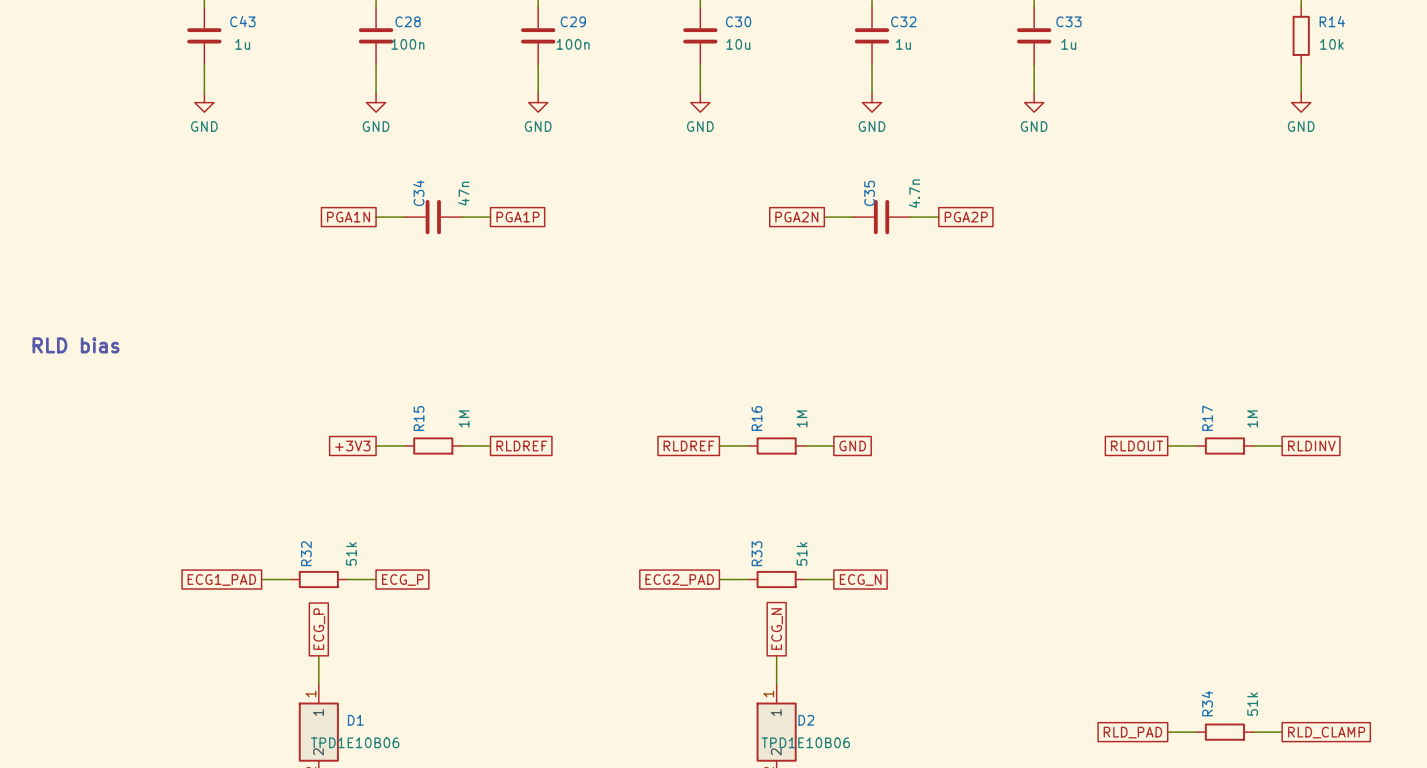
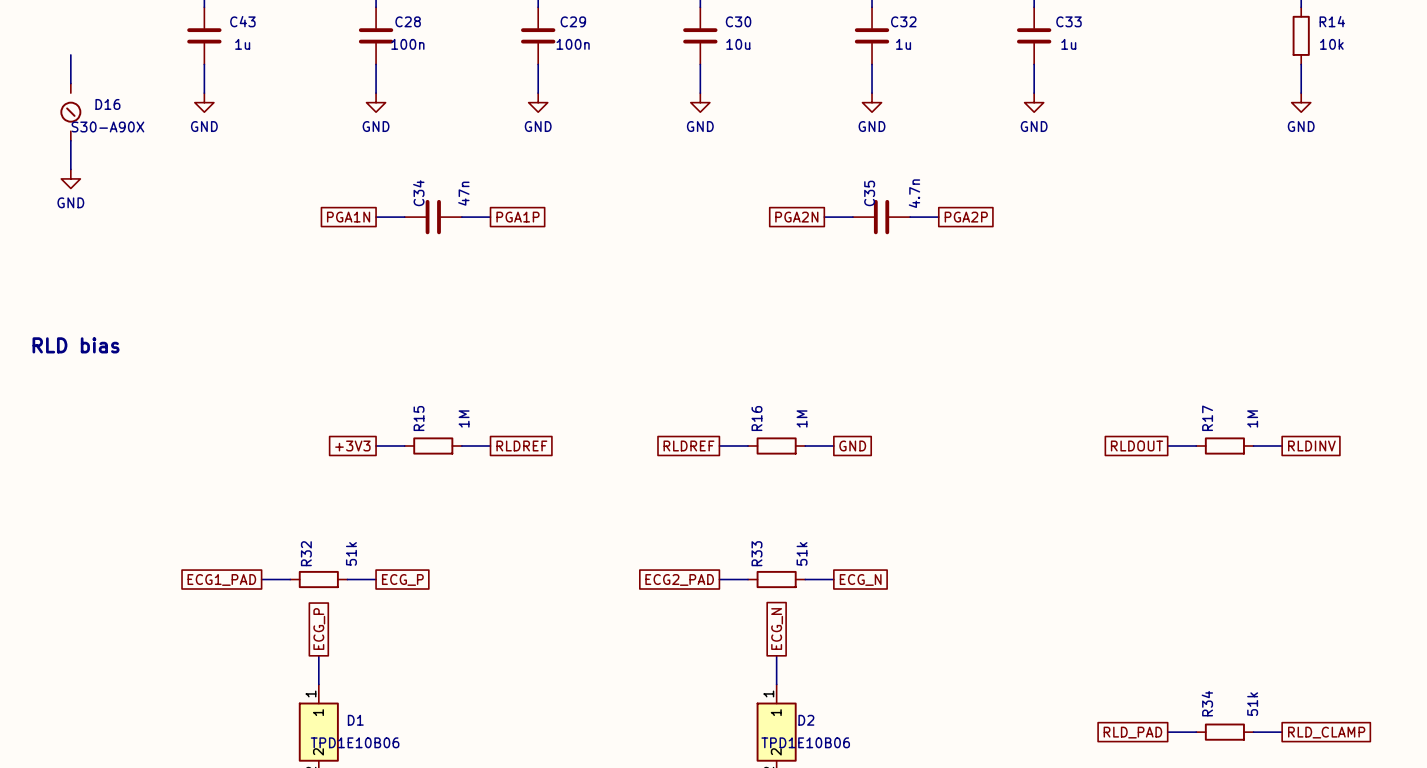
wire: none -> (70, 54) (70, 83)
D16: none -> S30-A90X (70, 112)
wire: none -> (70, 140) (70, 169)
power symbol: none -> GND (70, 178)

